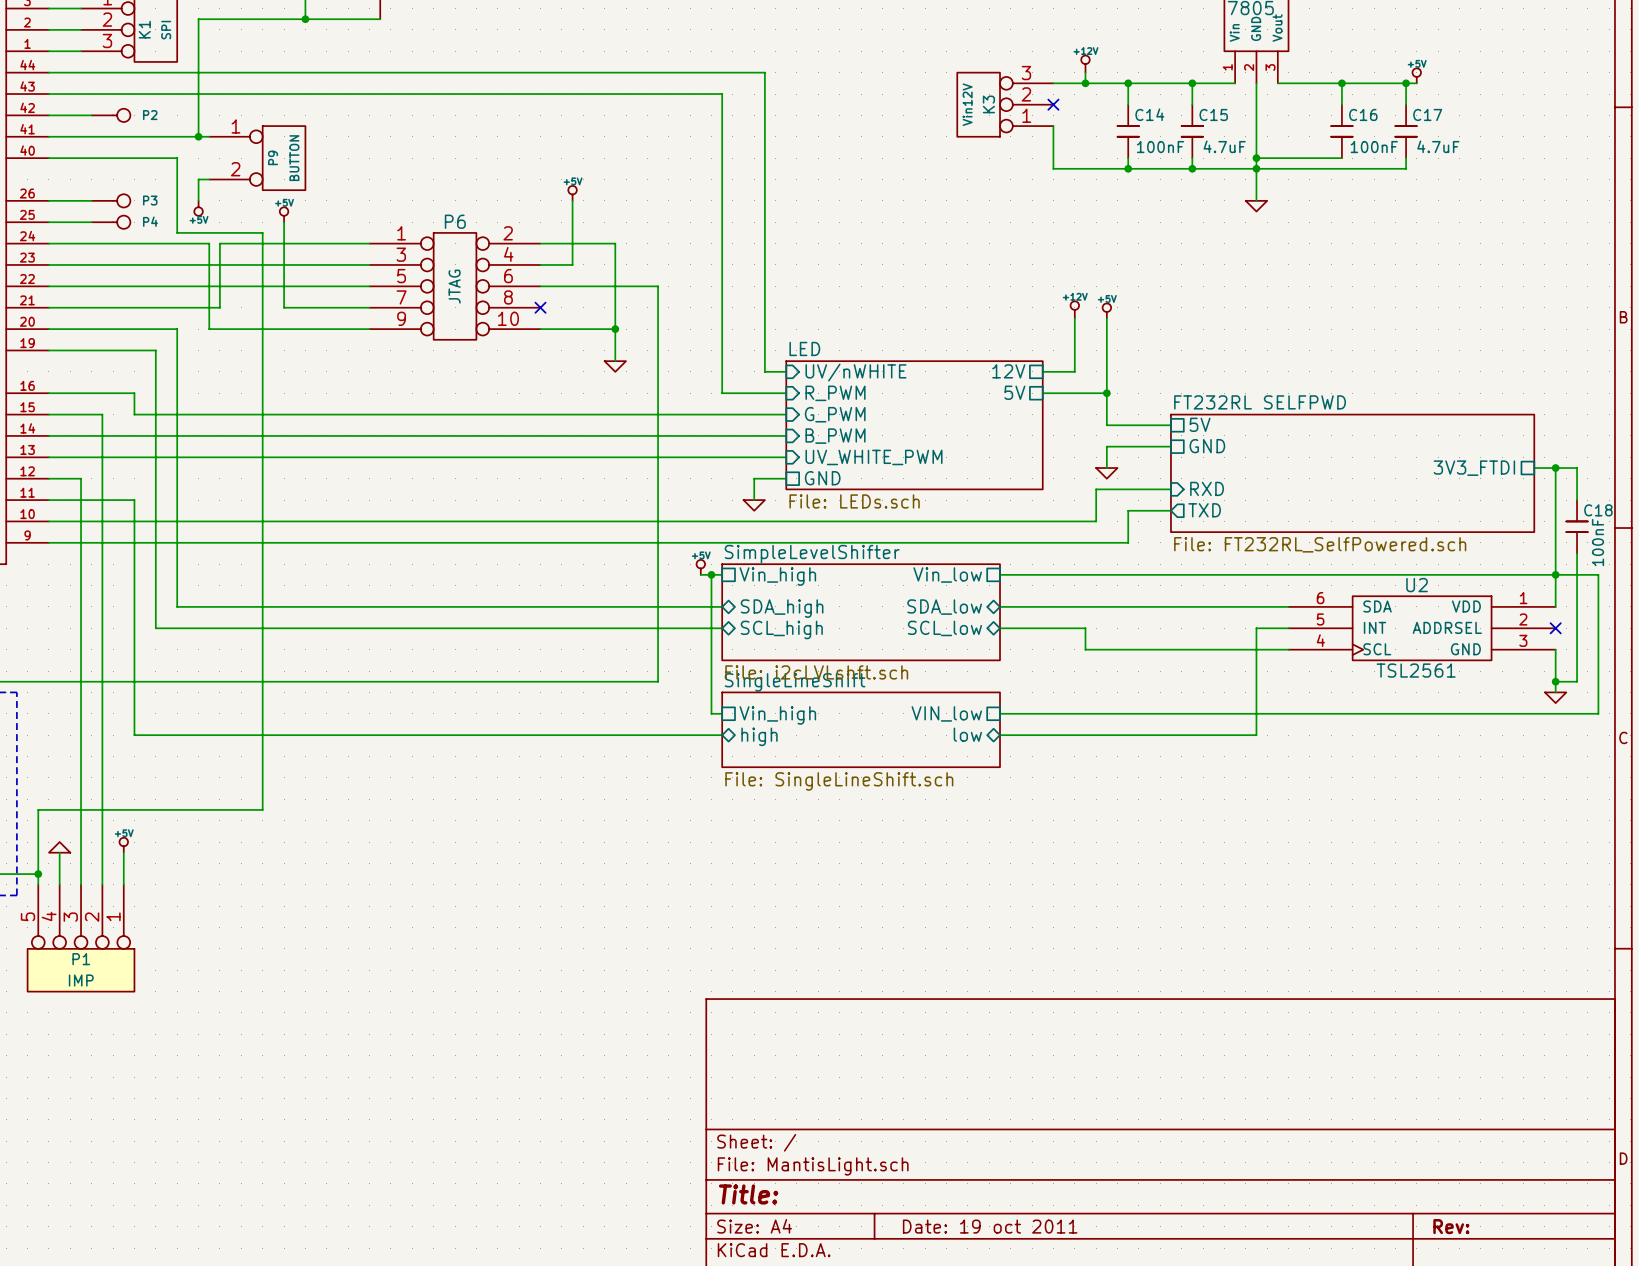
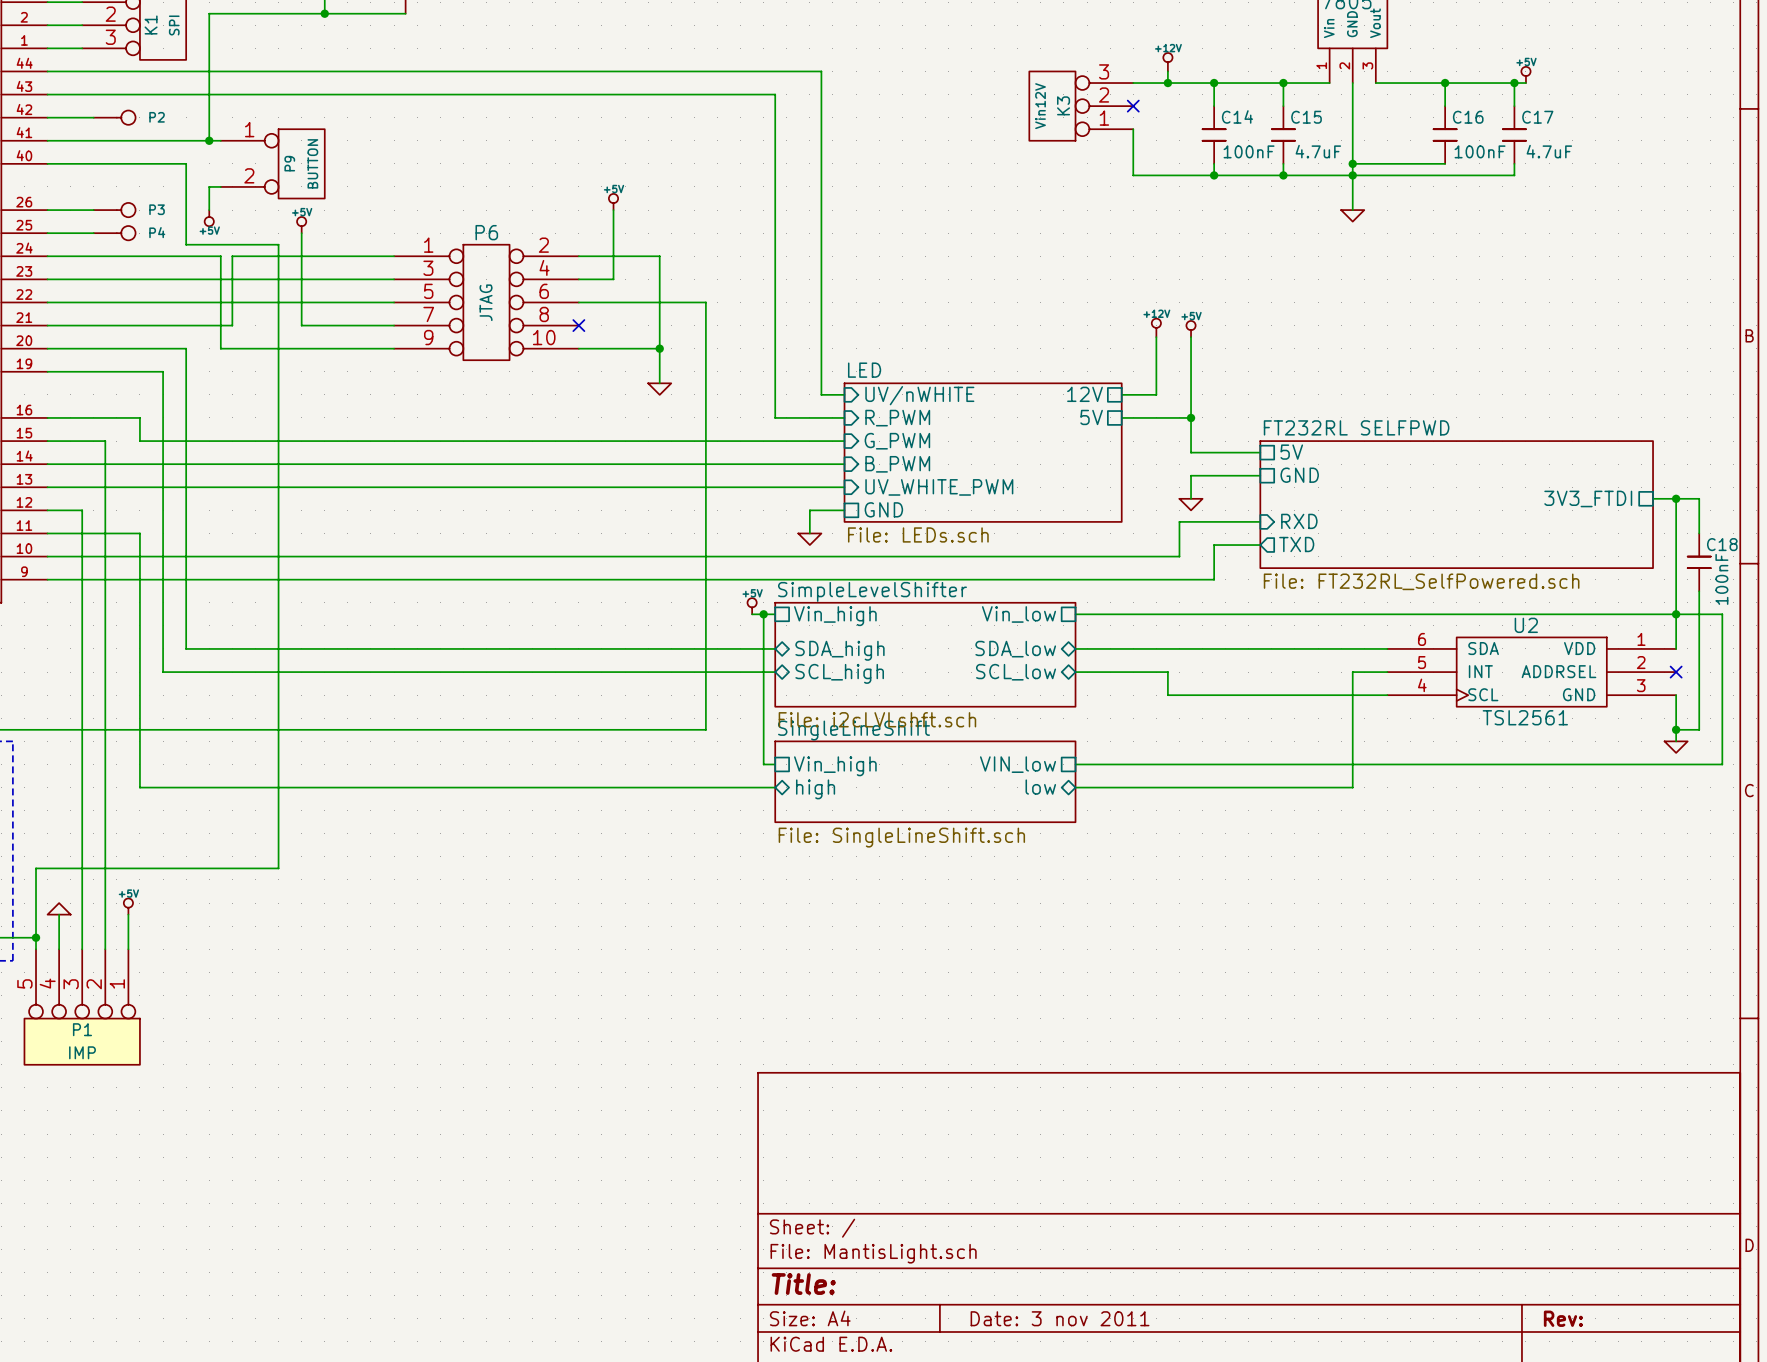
title block: Date: 19 oct 2011 (990, 1226) -> Date: 3 nov 2011 (1060, 1318)

